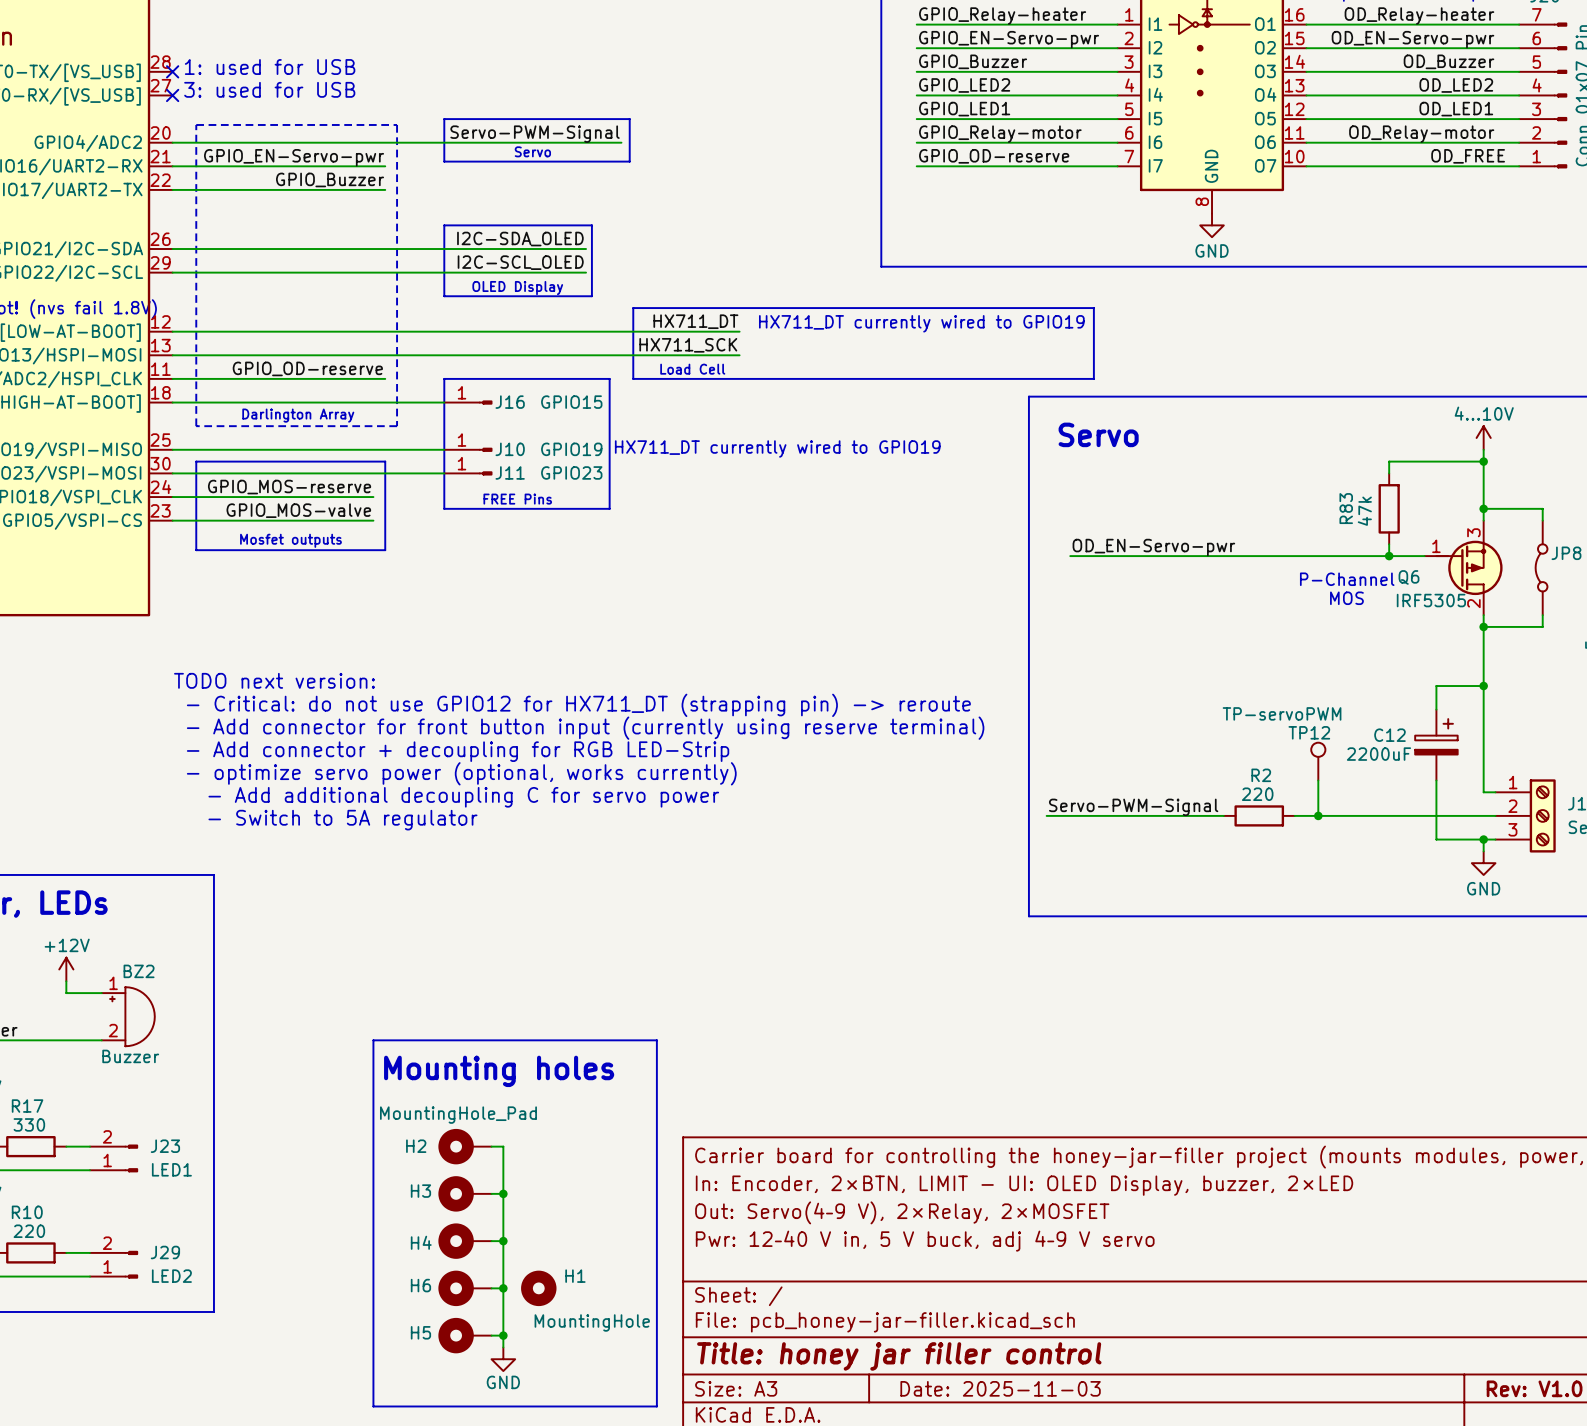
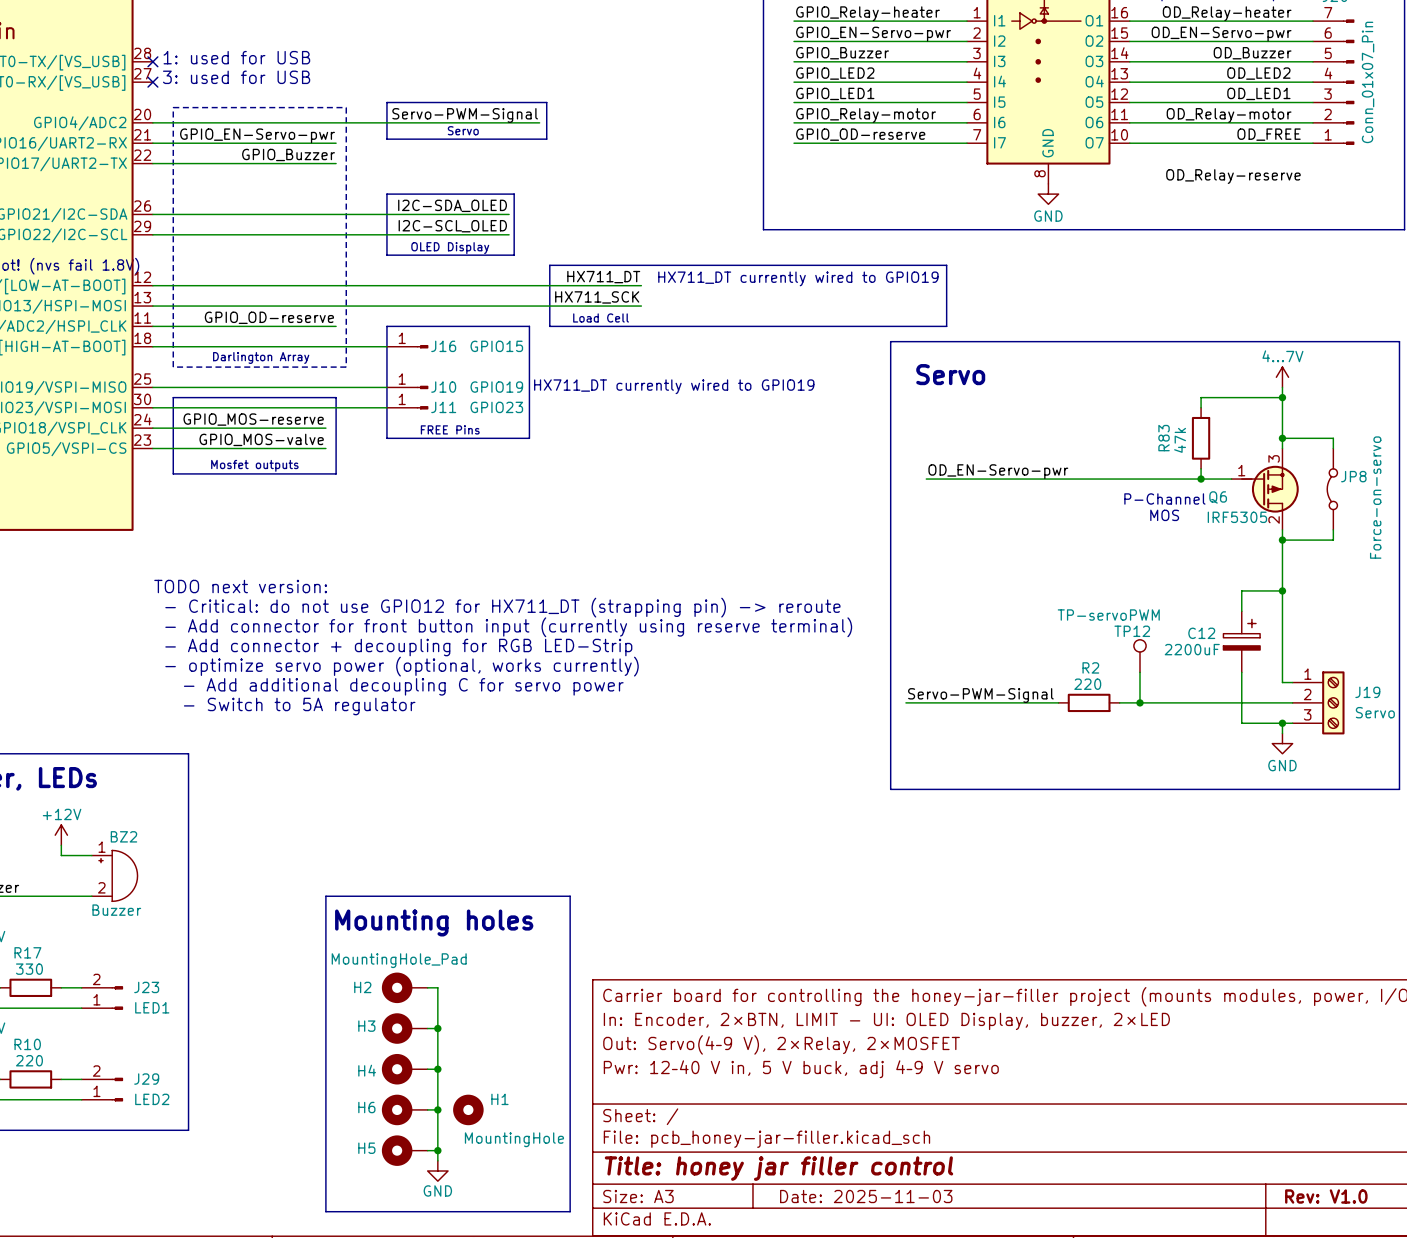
label: none -> OD_Relay-reserve (1233, 176)
power symbol: 4...10V (1483, 437) -> 4...7V (1282, 377)

